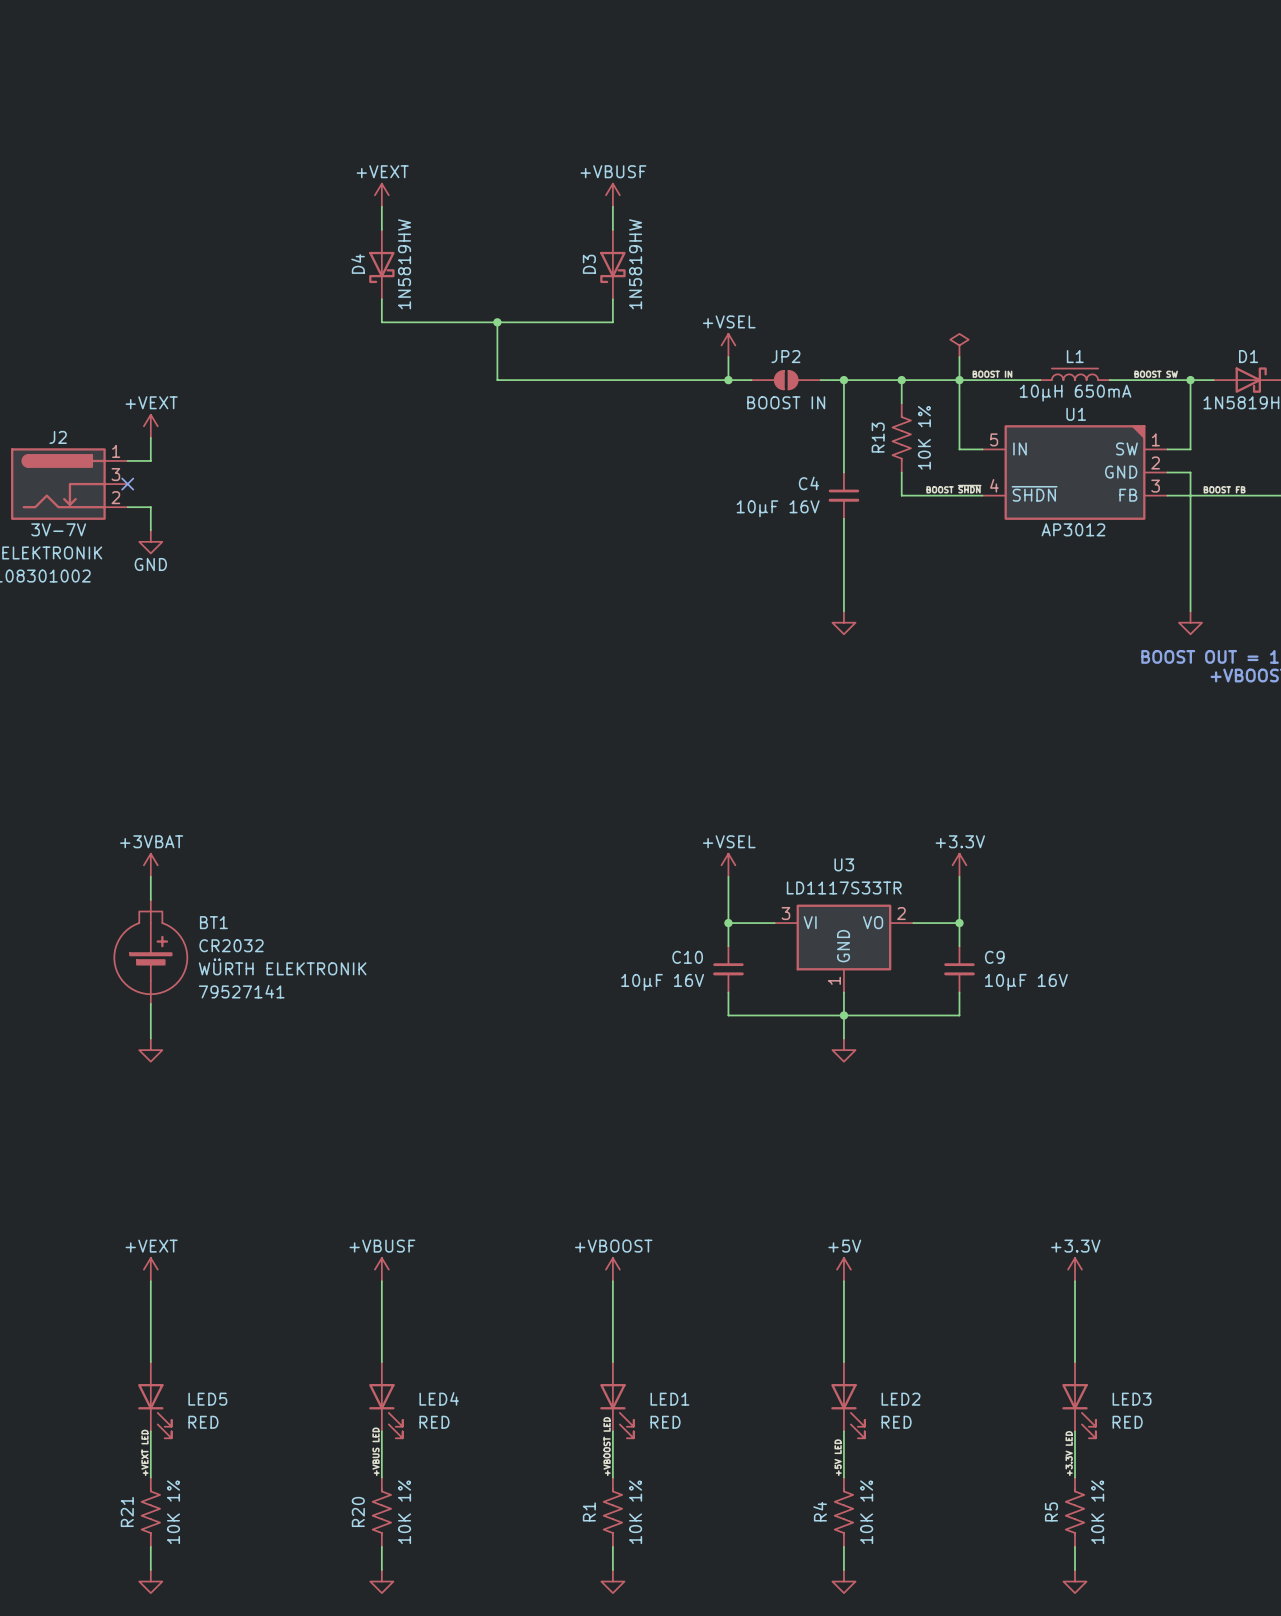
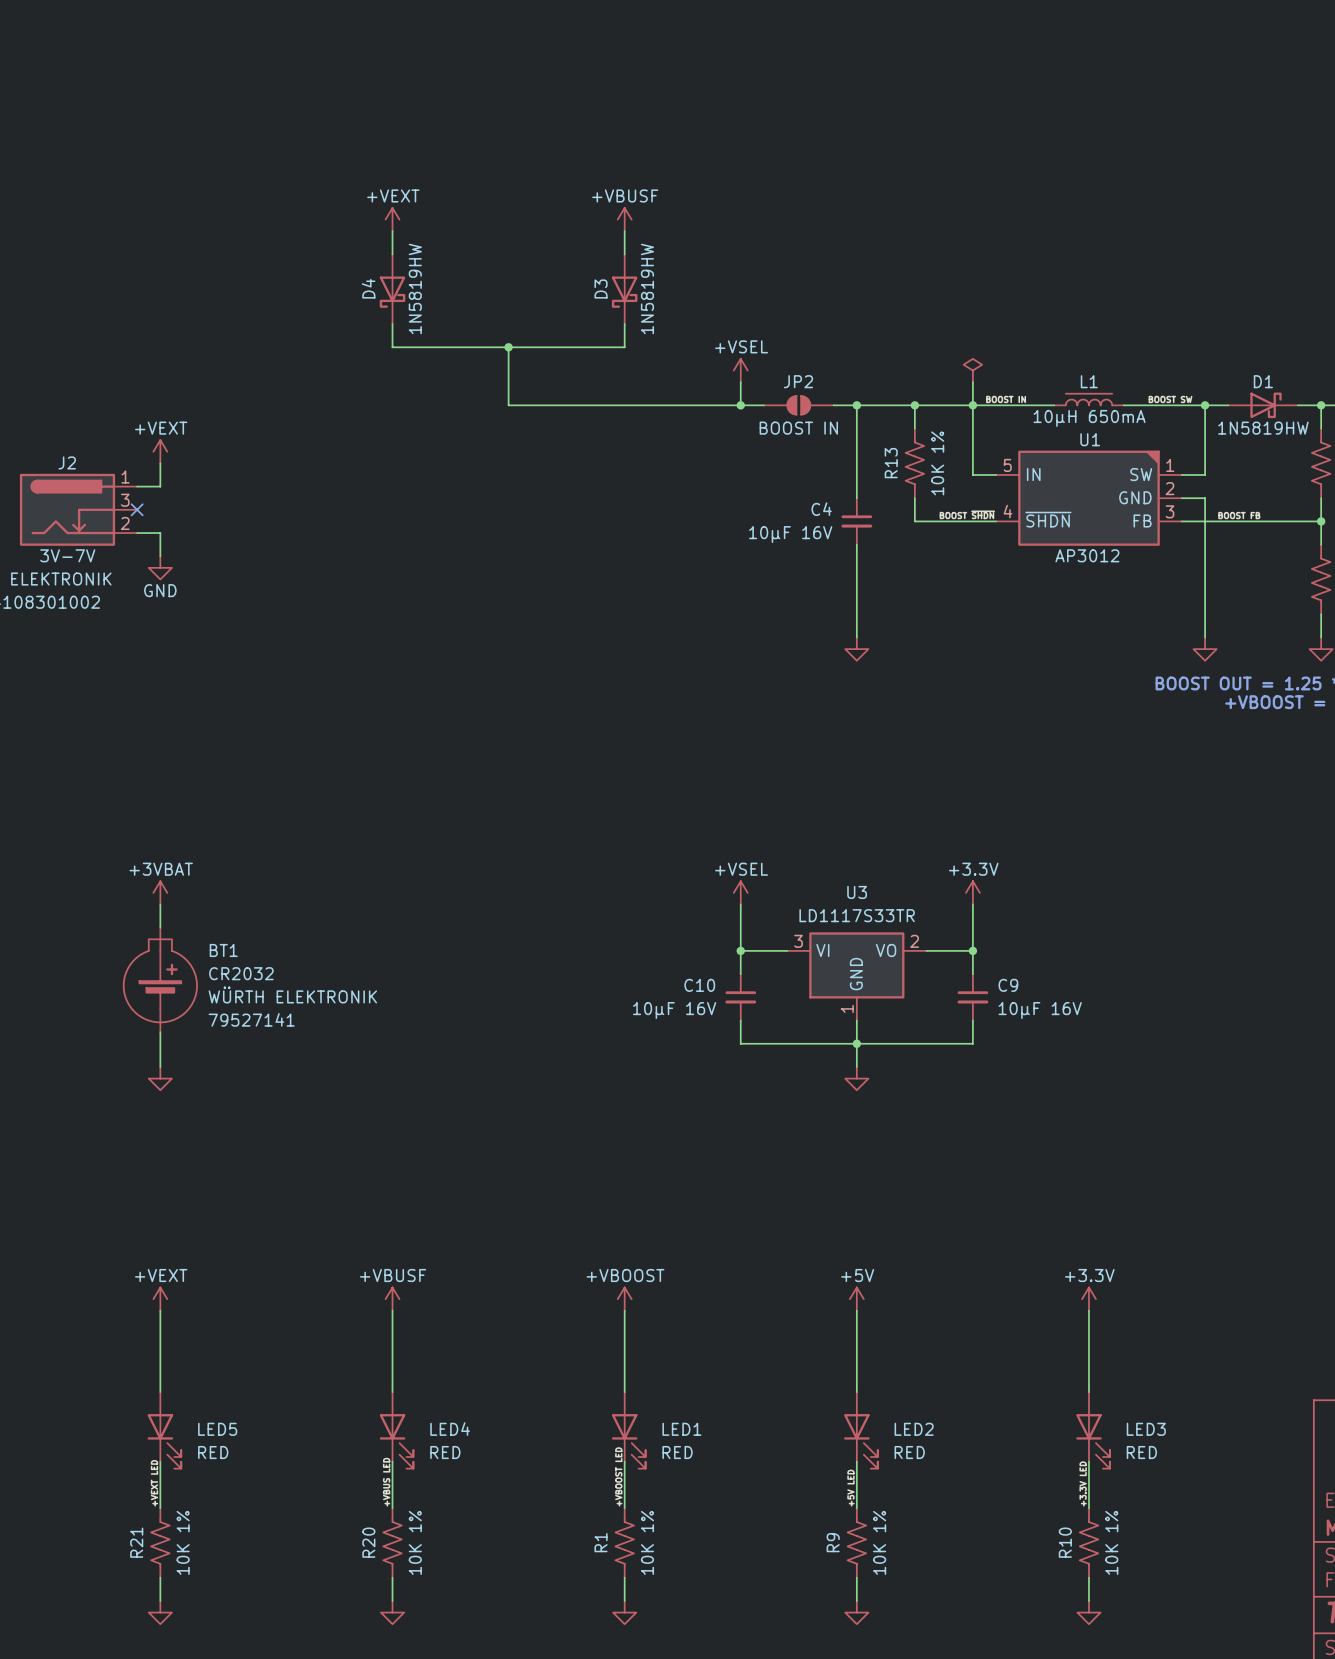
R4 name: R4 (820, 1511) -> R9 (833, 1542)
R5 name: R5 (1051, 1511) -> R10 (1065, 1542)

